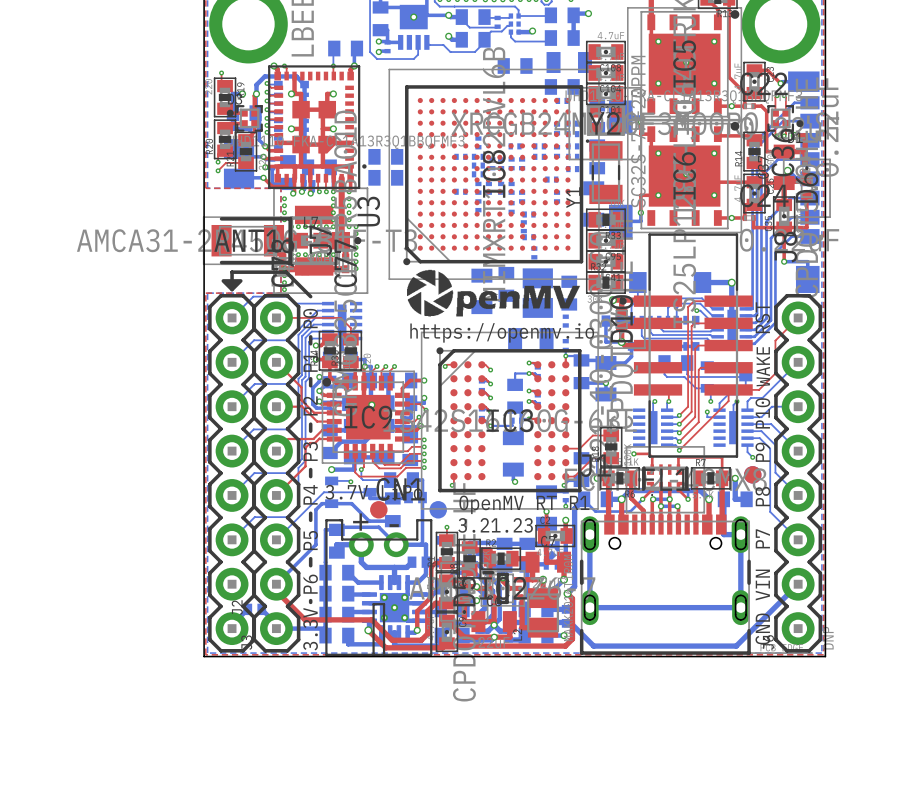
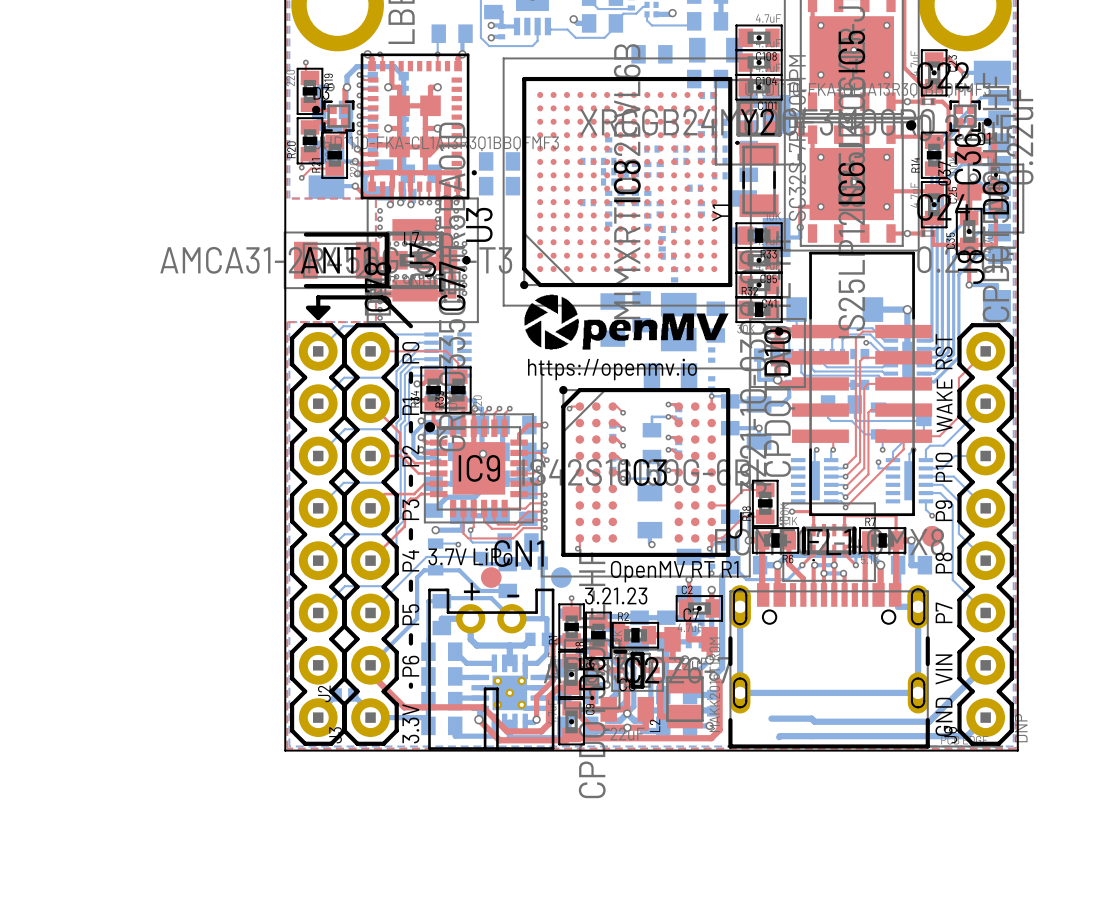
bottom track: (567, 623) (571, 623) (593, 646) (736, 646) (750, 632) -> (771, 718) (811, 718) (814, 721) (929, 721)
bottom track: none -> (985, 717) (967, 736) (779, 737)

